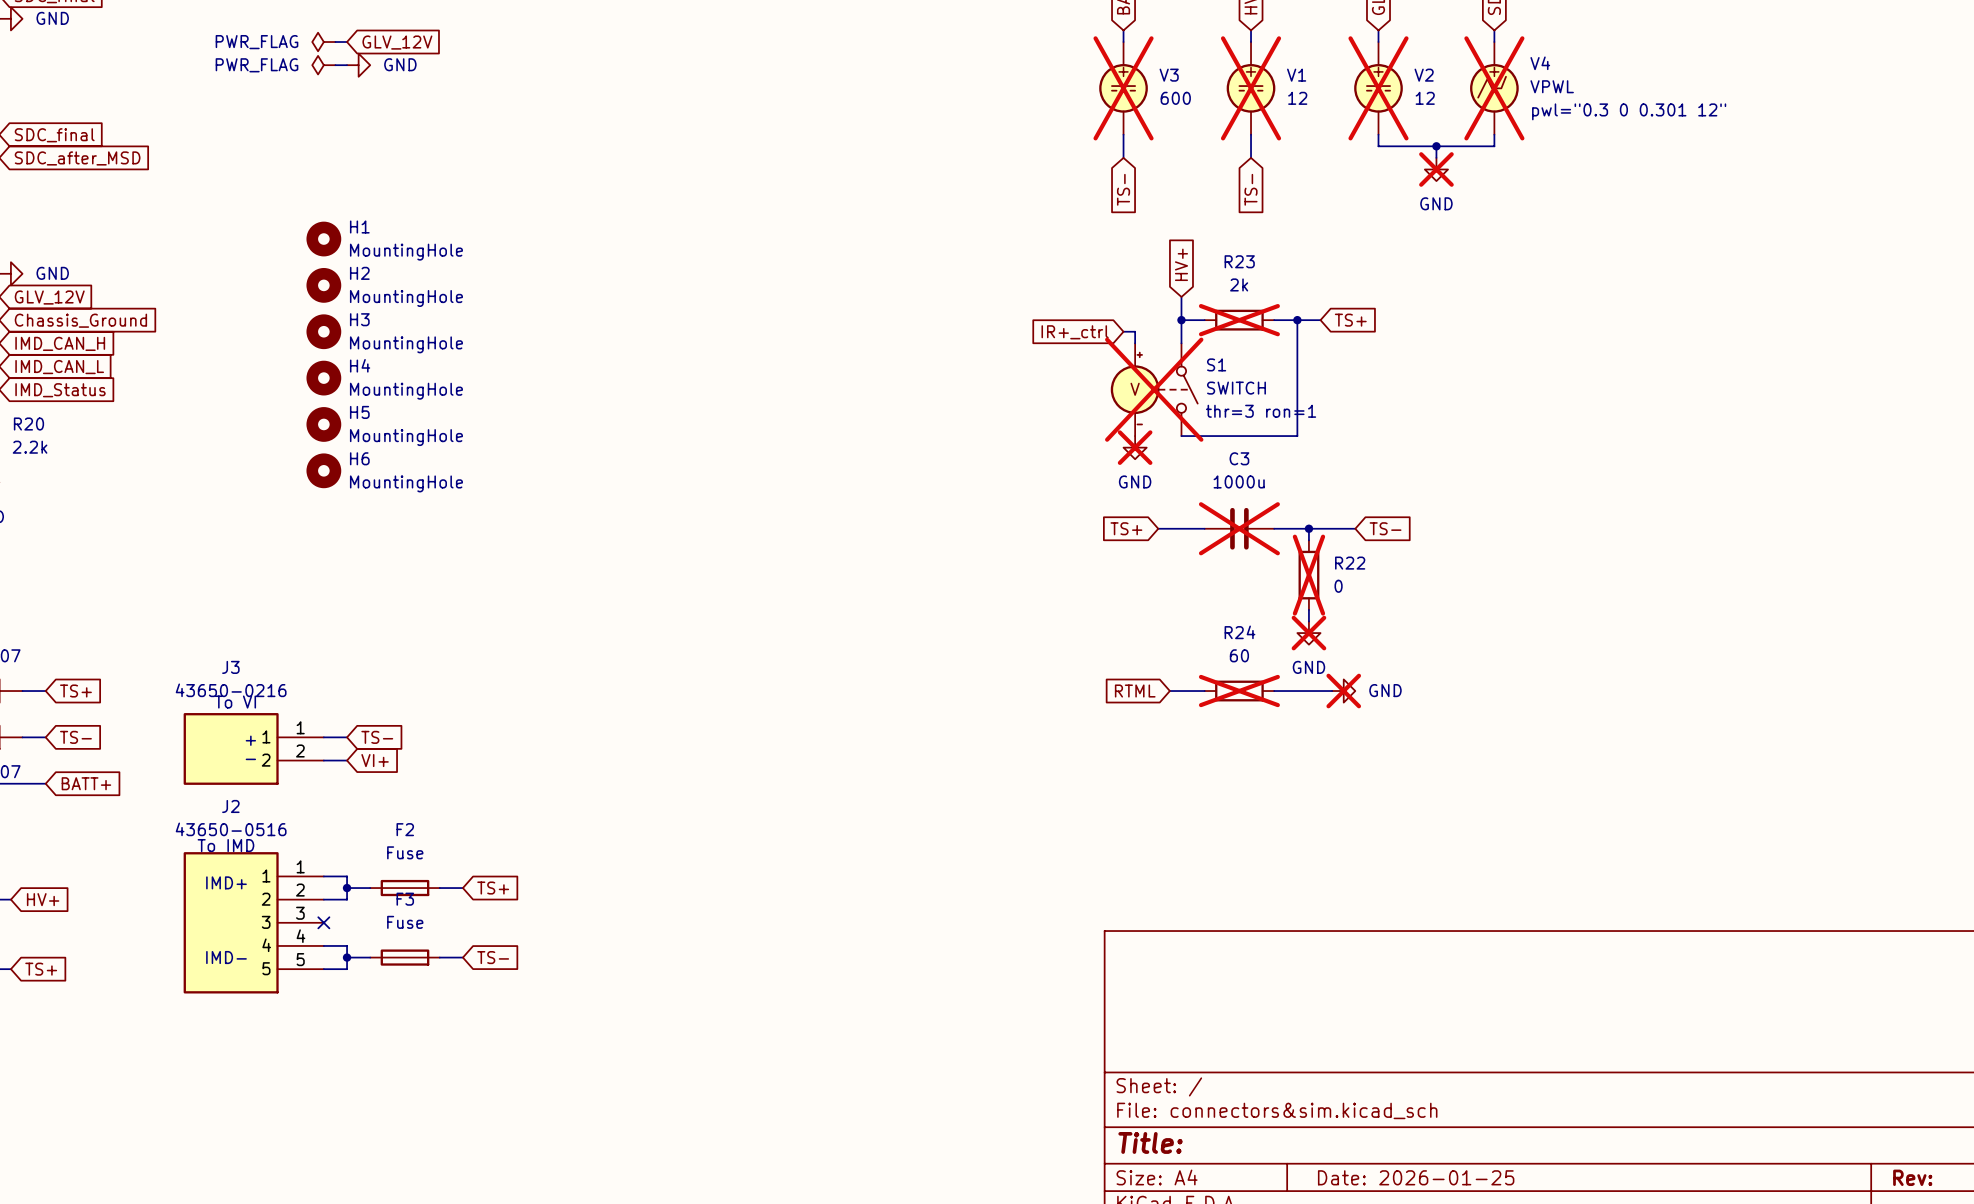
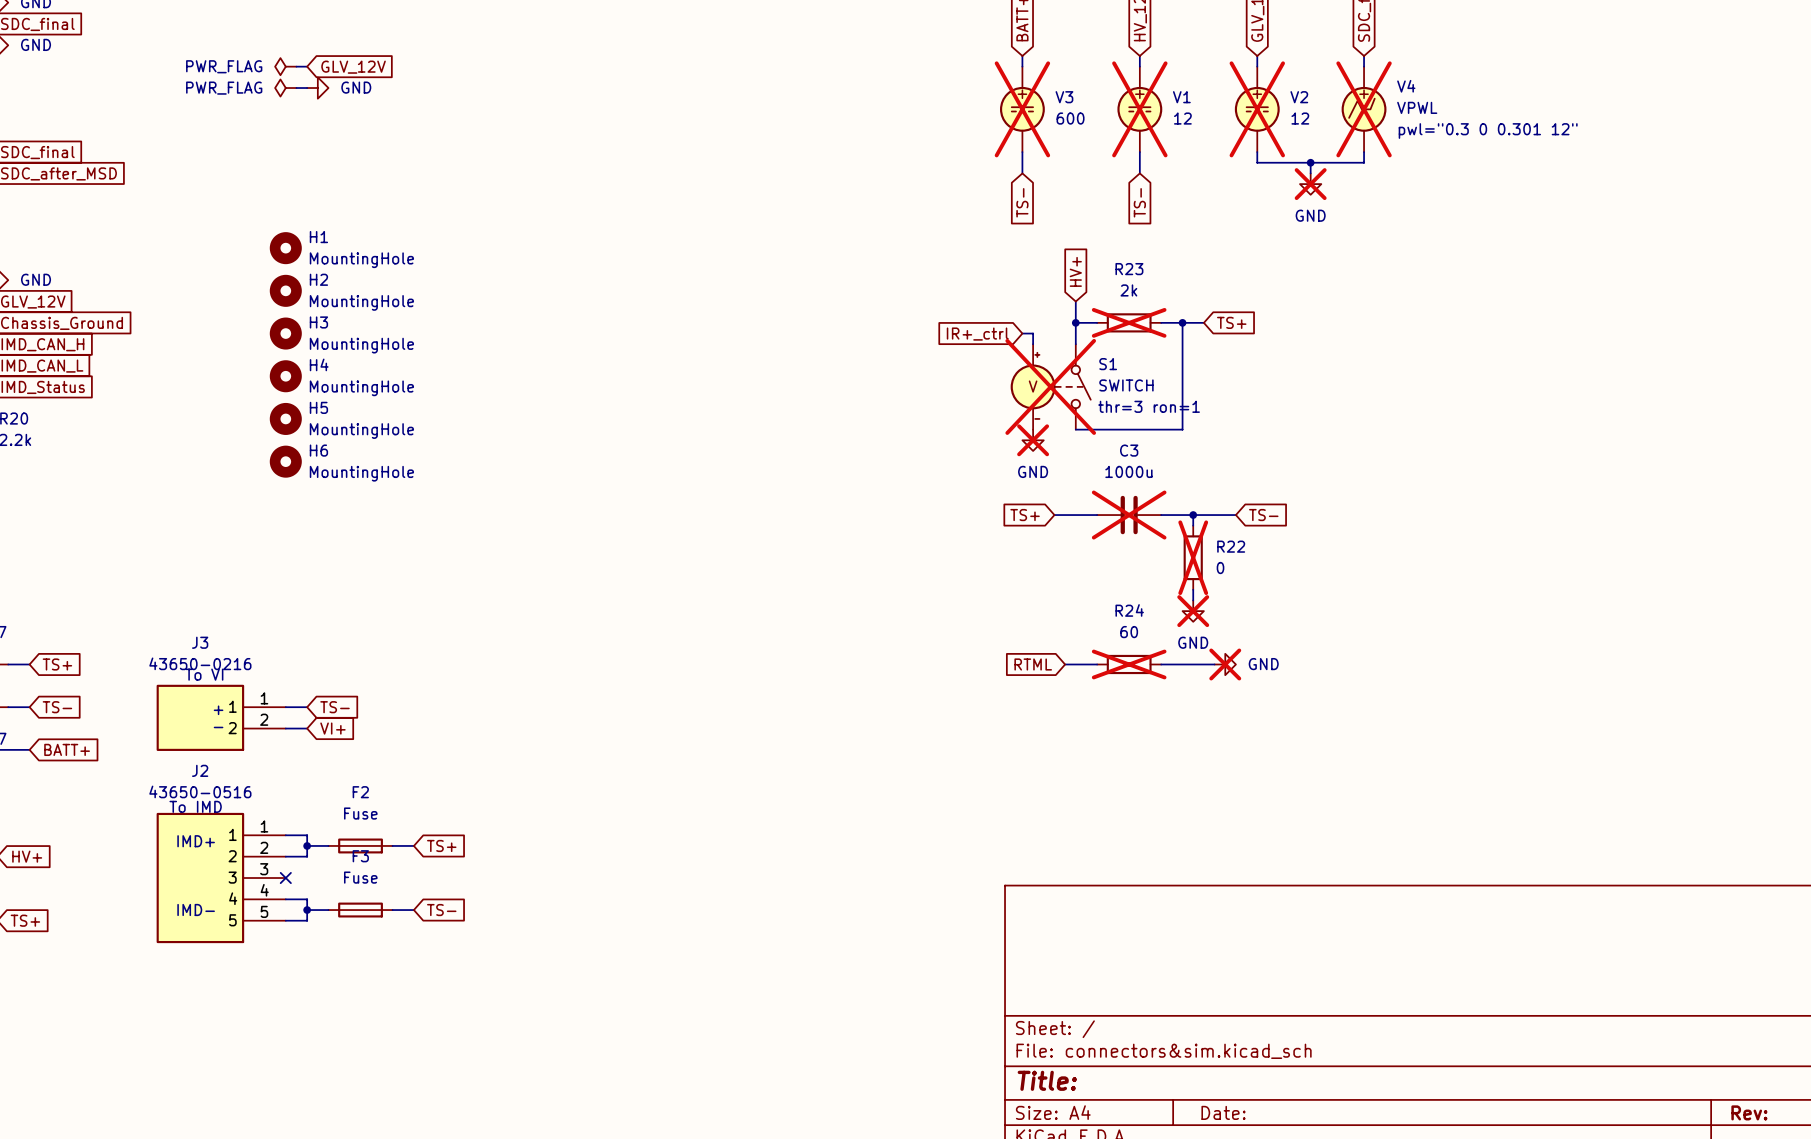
title block: Date: 2026-01-25 (1416, 1177) -> Date: (1223, 1112)

